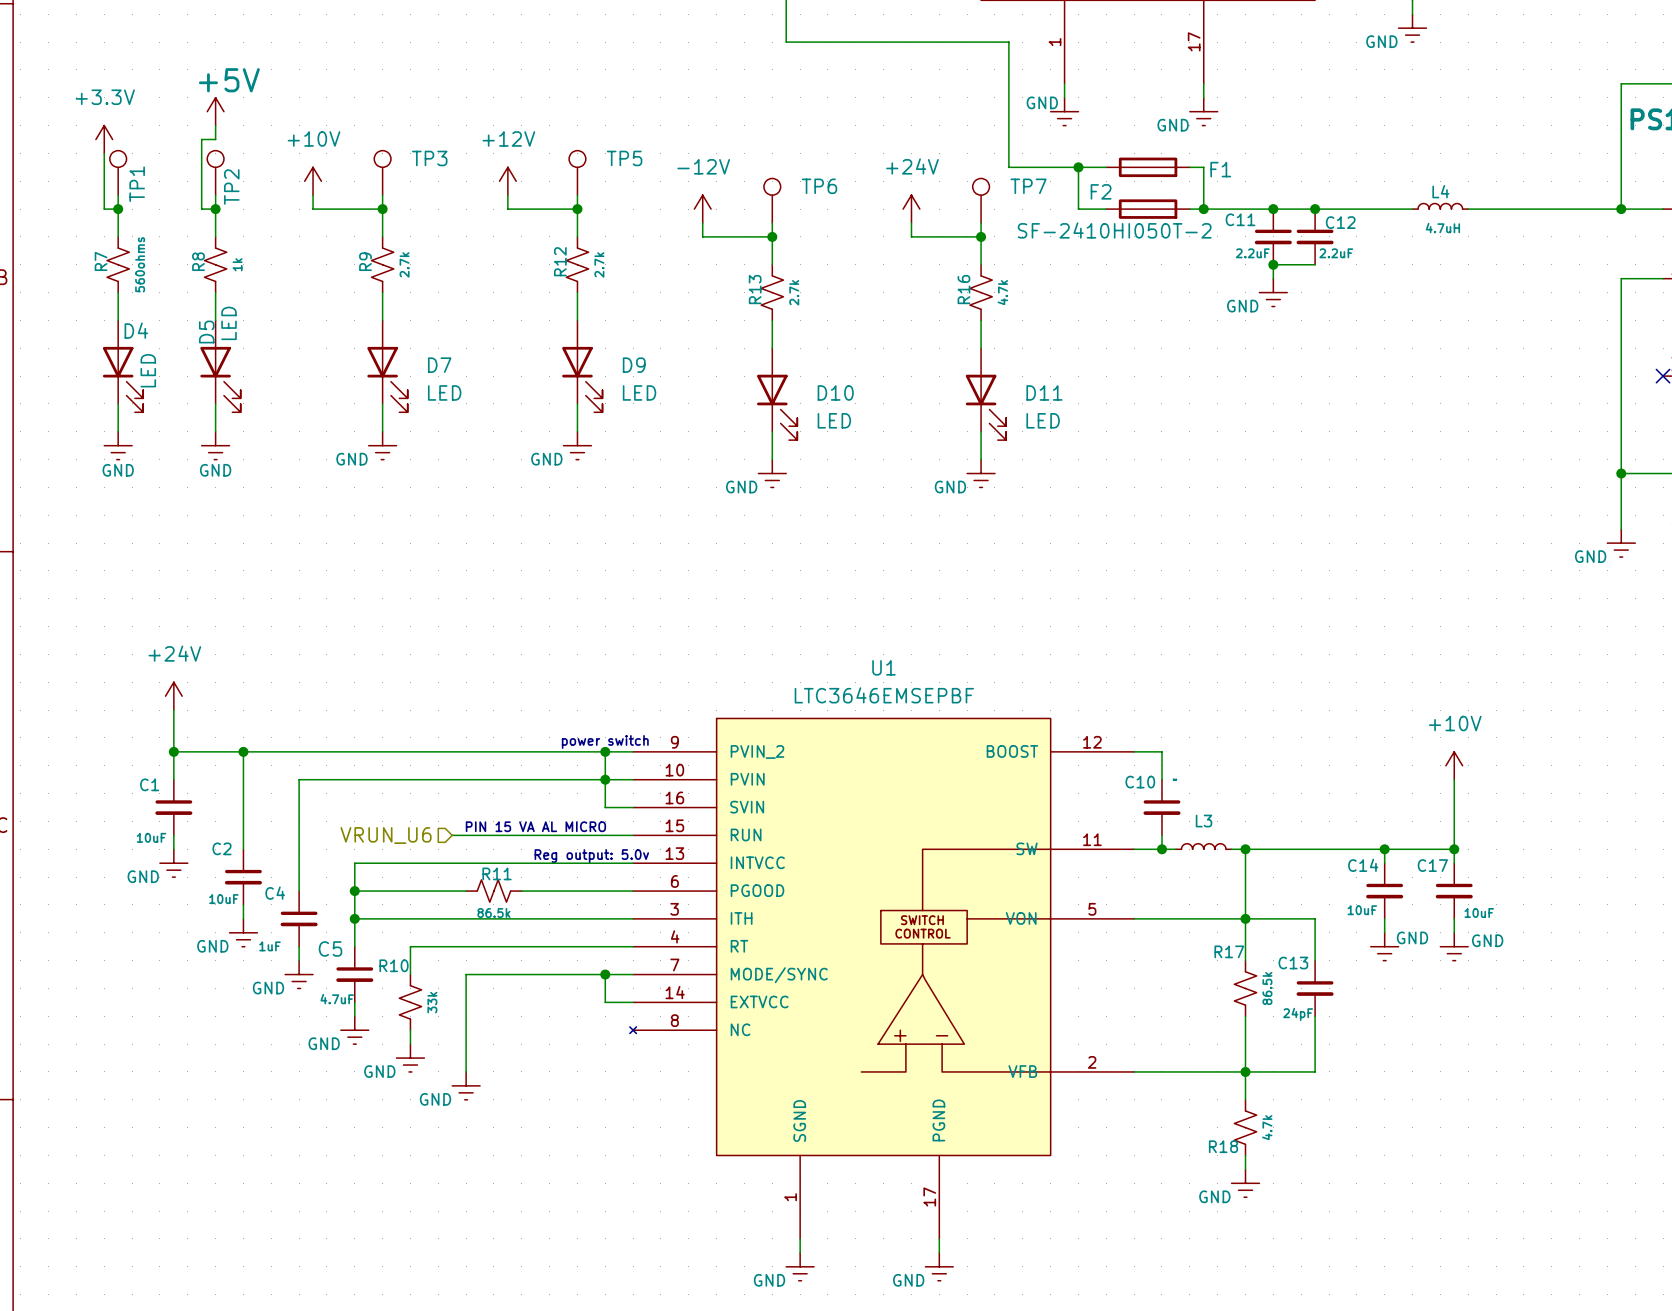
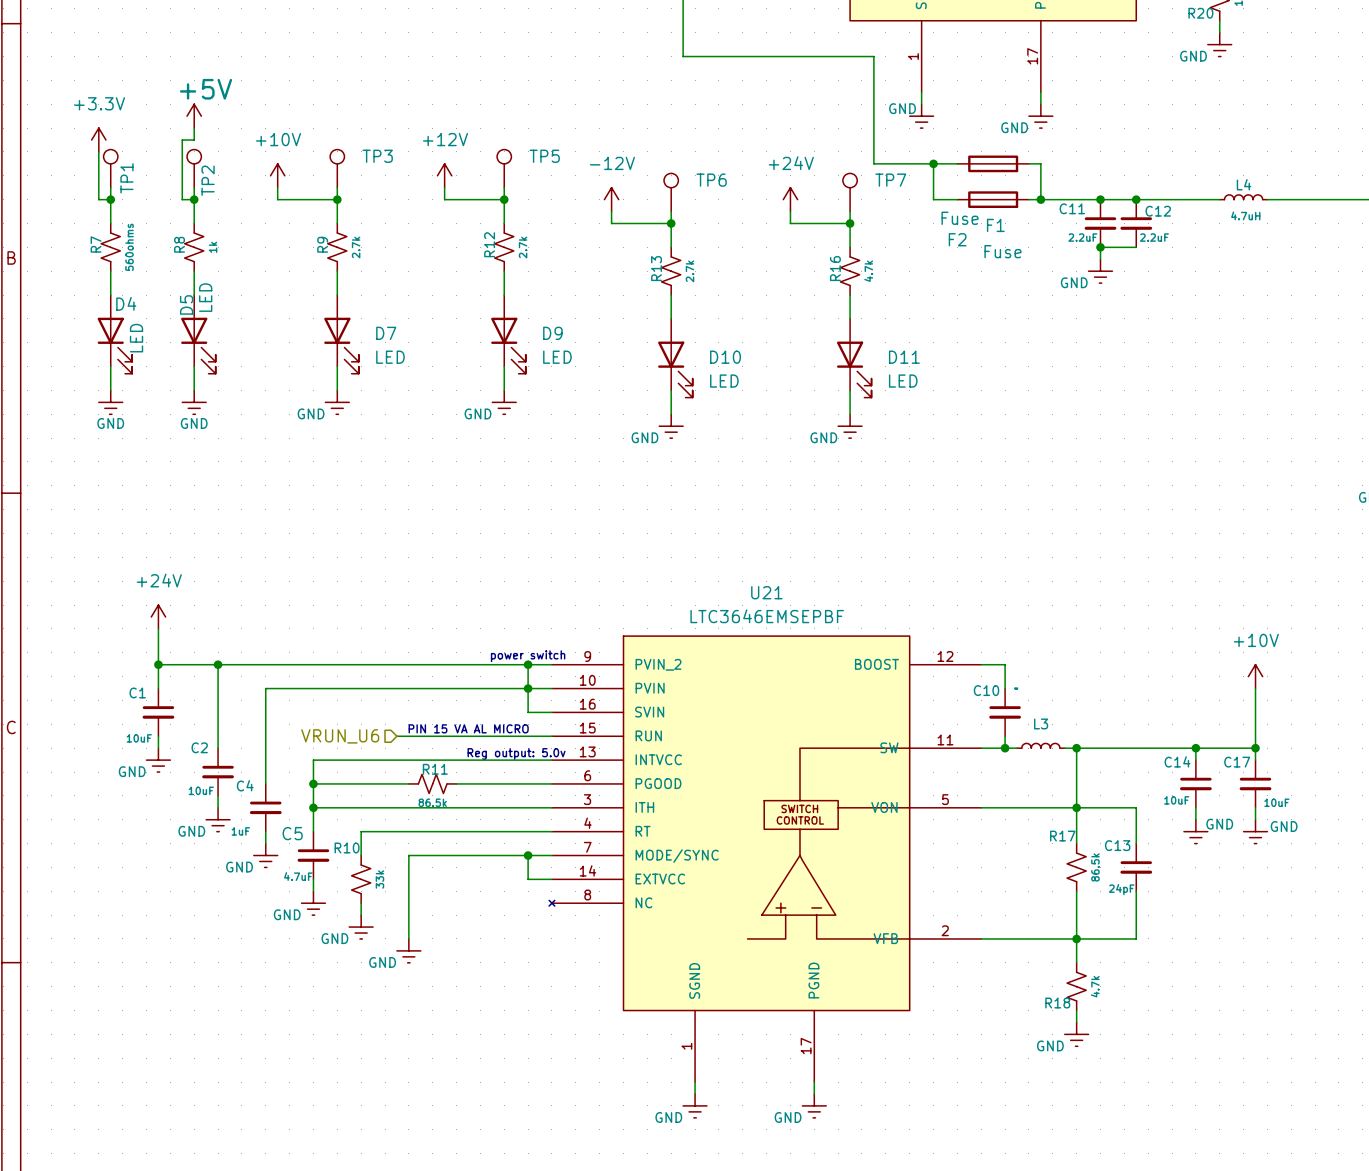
F1 name position: F1 (1220, 169) -> F1 (995, 225)
F2 name position: F2 (1101, 191) -> F2 (957, 239)
F2 value: SF-2410HI050T-2 (1114, 230) -> Fuse (960, 218)
F1 value: none -> Fuse (1002, 251)
U1 name: U1 (883, 667) -> U21 (766, 592)

